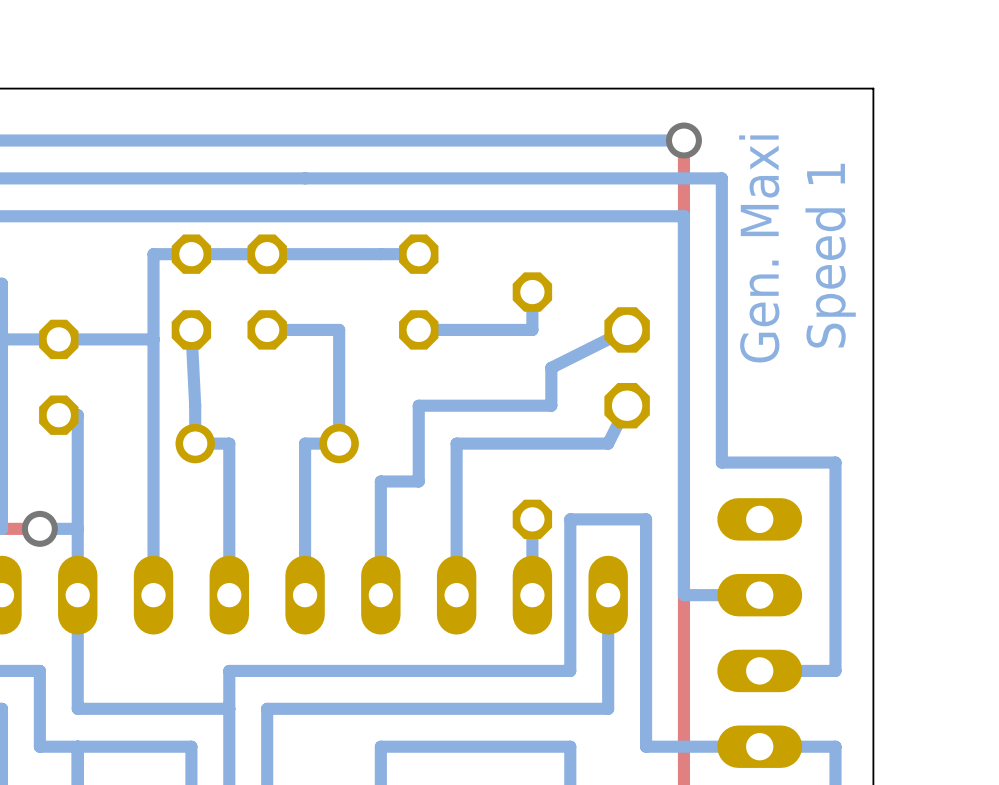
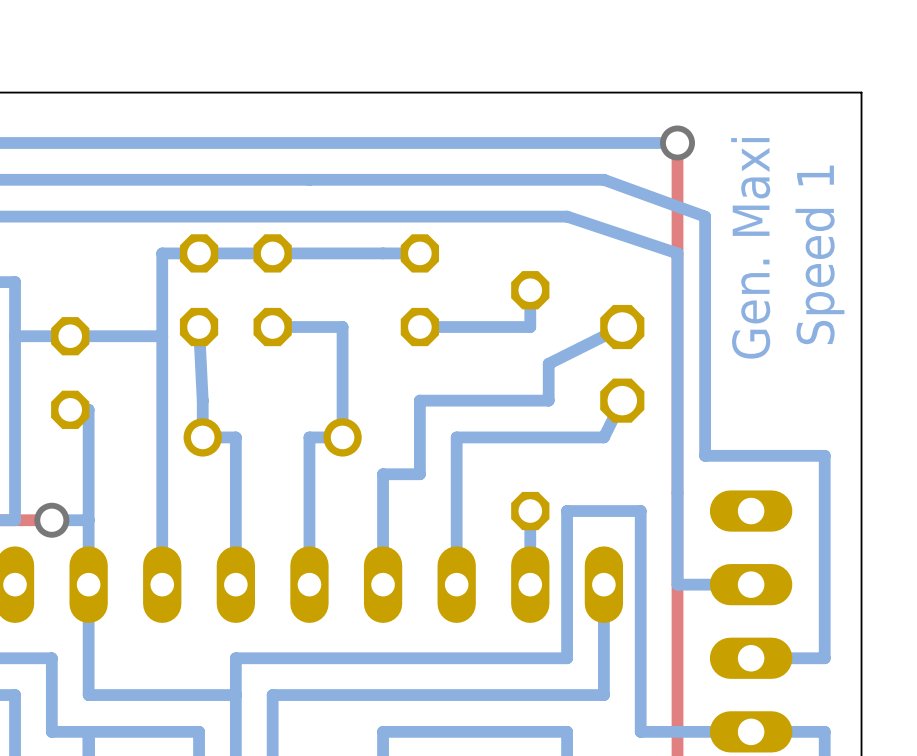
bottom track: (608, 178) (721, 178) (721, 462) -> (603, 179) (705, 216) (705, 455) (714, 455)
bottom track: (570, 216) (683, 216) (683, 254) -> (567, 216) (677, 253)

